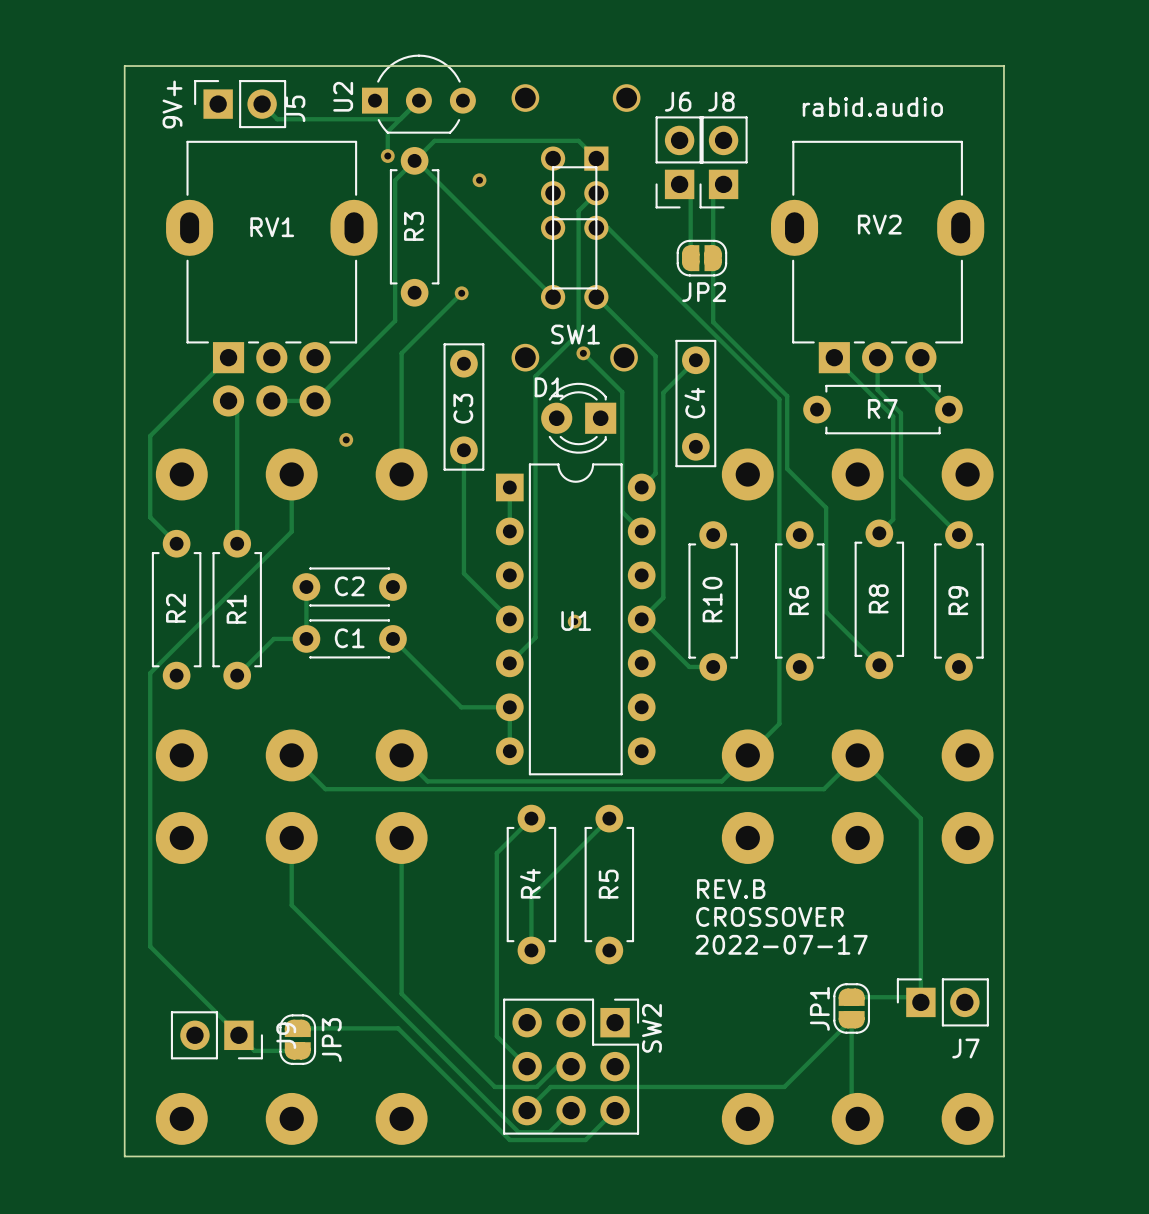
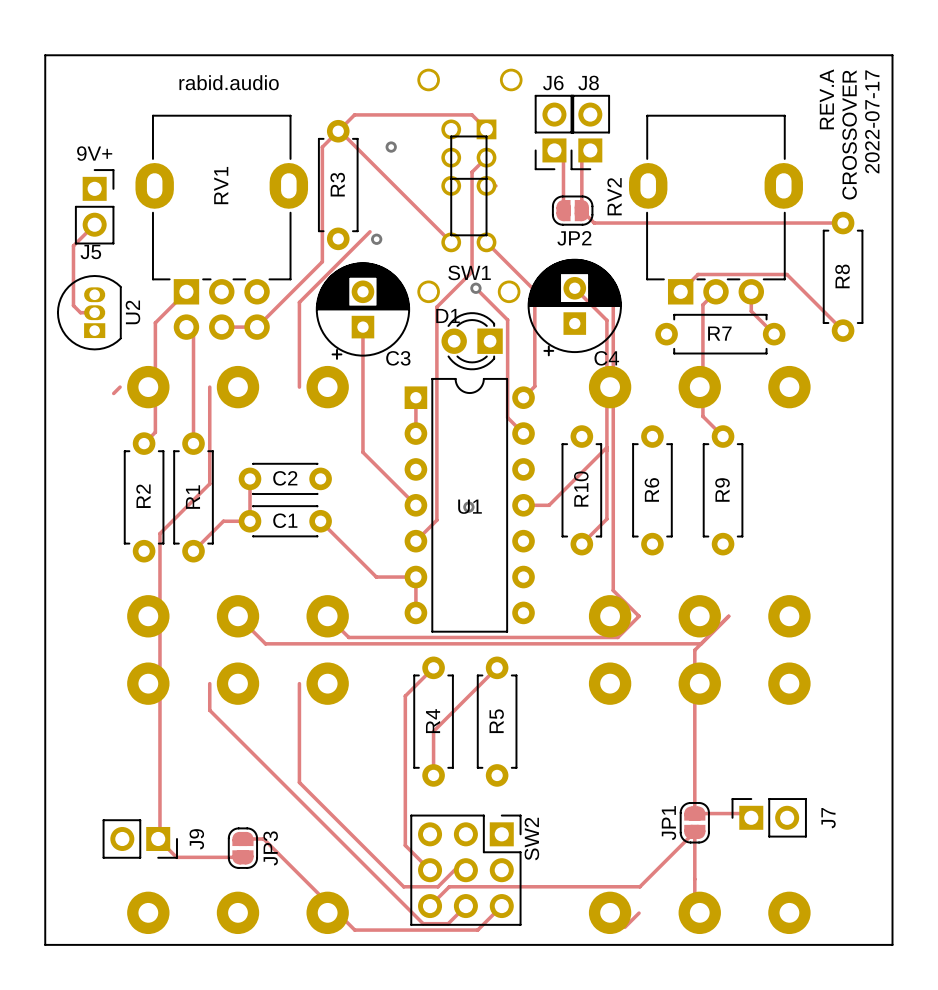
U2 footprint: [361, 54, 476, 134] -> [57, 275, 122, 351]
board edge: (124, 66) (1003, 66) (1003, 1156) (124, 1156) (124, 66) -> (45, 55) (45, 944) (892, 944) (892, 55) (45, 55)
U2 name position: U2 (343, 96) -> U2 (132, 312)
track: (418, 100) (387, 131) (387, 156) -> none
text: none -> rabid.audio (229, 82)
text rotation: 0° (172, 104) -> 90° clockwise (94, 153)
text position: 9V+ (172, 104) -> 9V+ (94, 153)
J5 rotation: 0° (240, 104) -> 90° clockwise (94, 206)
J5 position: (240, 104) -> (94, 206)
track: (262, 104) (277, 119) (400, 119) -> none
text: rabid.audio (872, 106) -> none
text: none -> REV.A (826, 99)
via: (387, 156) -> none
text: none -> CROSSOVER (849, 134)
text: none -> 2022-07-17 (872, 121)
RV2 name rotation: 0° (879, 224) -> 90° counterclockwise (614, 196)
RV2 name position: RV2 (879, 224) -> RV2 (614, 196)
RV1 name rotation: 0° (272, 227) -> 90° counterclockwise (221, 185)
track: (607, 227) (779, 399) (779, 723) (721, 781) -> (613, 298) (613, 590) (639, 616) (617, 637) (588, 637)
track: (713, 258) (713, 322) (787, 396) (787, 468) (826, 507) (826, 612) (879, 665) -> (581, 210) (594, 223) (843, 223)
track: none -> (94, 224) (73, 245) (73, 305) (80, 312) (94, 312)
track: none -> (370, 231) (299, 302) (299, 387)
track: (461, 293) (401, 353) (401, 474) -> none
C4 footprint: [675, 339, 717, 468] -> [527, 258, 622, 357]
C3 footprint: [443, 343, 485, 471] -> [315, 262, 410, 360]
track: (834, 357) (893, 416) (893, 519) (879, 533) -> (680, 291) (697, 274) (786, 274) (843, 330)
track: (877, 357) (877, 389) (900, 413) (900, 477) (958, 535) -> (715, 291) (702, 304) (702, 416) (723, 436) (723, 443)
track: (695, 360) (663, 392) (663, 597) (641, 619) (689, 666) (713, 666) -> (574, 288) (606, 320) (606, 519) (581, 544)
track: (190, 395) (150, 435) (150, 517) (176, 543) -> (155, 322) (155, 432) (144, 443)
C4 name position: C4 (694, 403) -> C4 (606, 358)
C3 name position: C3 (463, 408) -> C3 (398, 358)
via: (346, 439) -> none
track: (463, 450) (463, 573) -> (362, 327) (362, 452) (378, 467)
track: none -> (120, 387) (113, 393)
track: none -> (209, 387) (209, 483) (159, 533) (159, 837)
track: (291, 474) (291, 531) (150, 673) (150, 946) (254, 1050) -> (158, 838) (176, 857) (207, 857)
track: none -> (606, 447) (549, 505) (523, 505)
R8 position: (879, 599) -> (843, 276)
R9 position: (958, 601) -> (723, 490)
track: none -> (728, 616) (694, 650) (694, 813)
track: (823, 789) (857, 755) (920, 818) (920, 1002) -> (672, 643) (701, 643)
track: (291, 837) (291, 905) -> (209, 683) (209, 710) (237, 738)
track: (401, 837) (401, 993) -> (299, 683) (299, 782) (327, 810)
text: REV.B (731, 889) -> none
text: CROSSOVER (769, 916) -> none
text: 2022-07-17 (781, 944) -> none
track: (323, 1028) (398, 1028) (509, 1140) -> (263, 838) (354, 930) (415, 930)
J9 position: (216, 1035) -> (140, 838)
J7 name rotation: 0° (965, 1048) -> 90° counterclockwise (828, 818)
J7 name position: J7 (965, 1048) -> J7 (828, 818)
track: none -> (639, 913) (624, 927)

